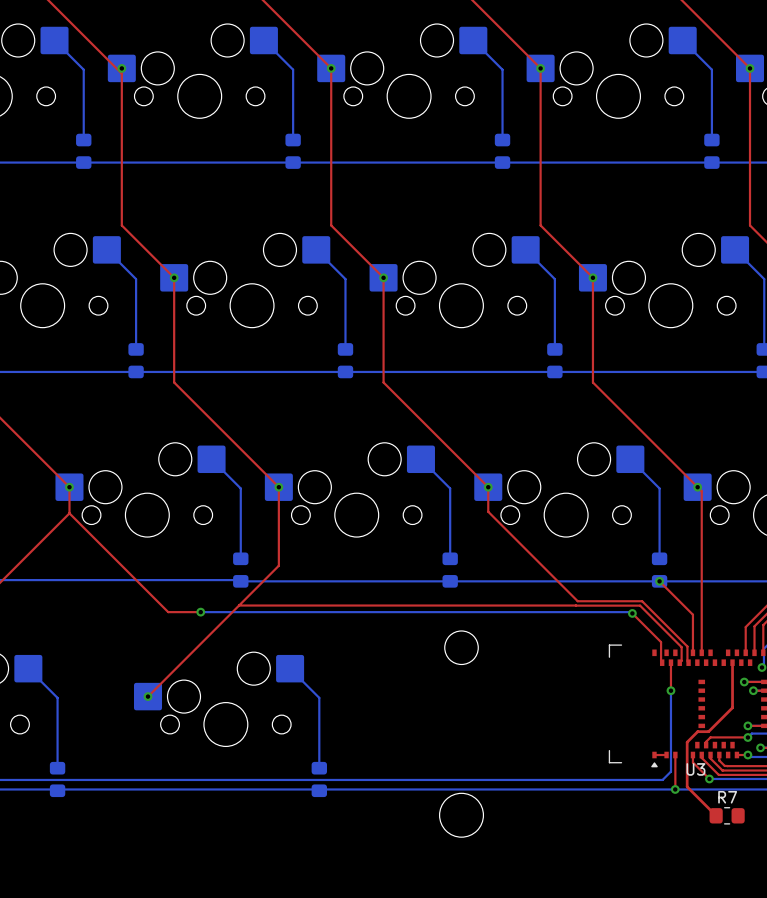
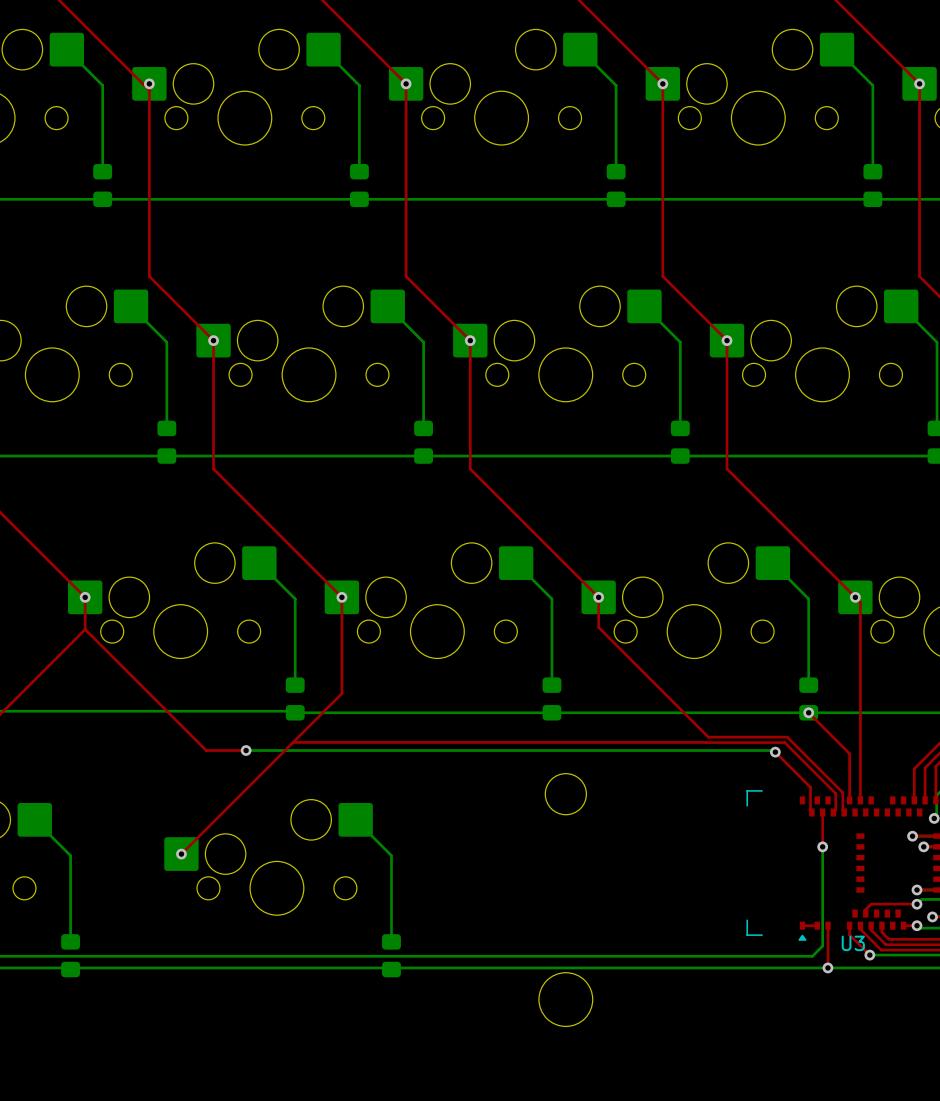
top track: (732, 662) (732, 707) (708, 731) (697, 731) (687, 742) (687, 786) (716, 815) -> none
R7: (727, 815) -> none

